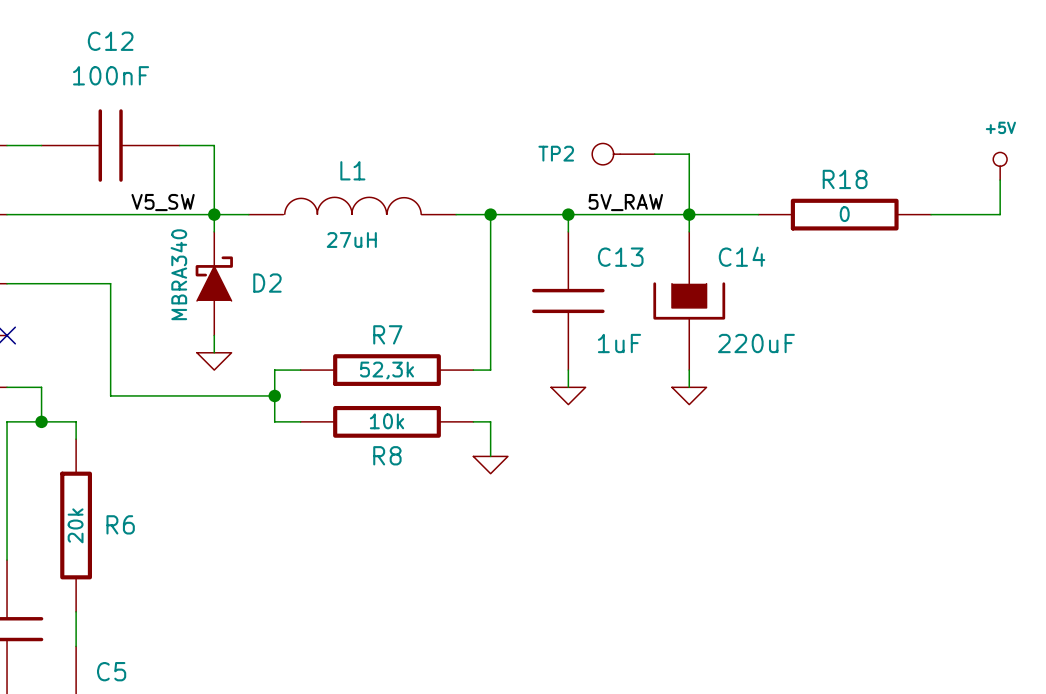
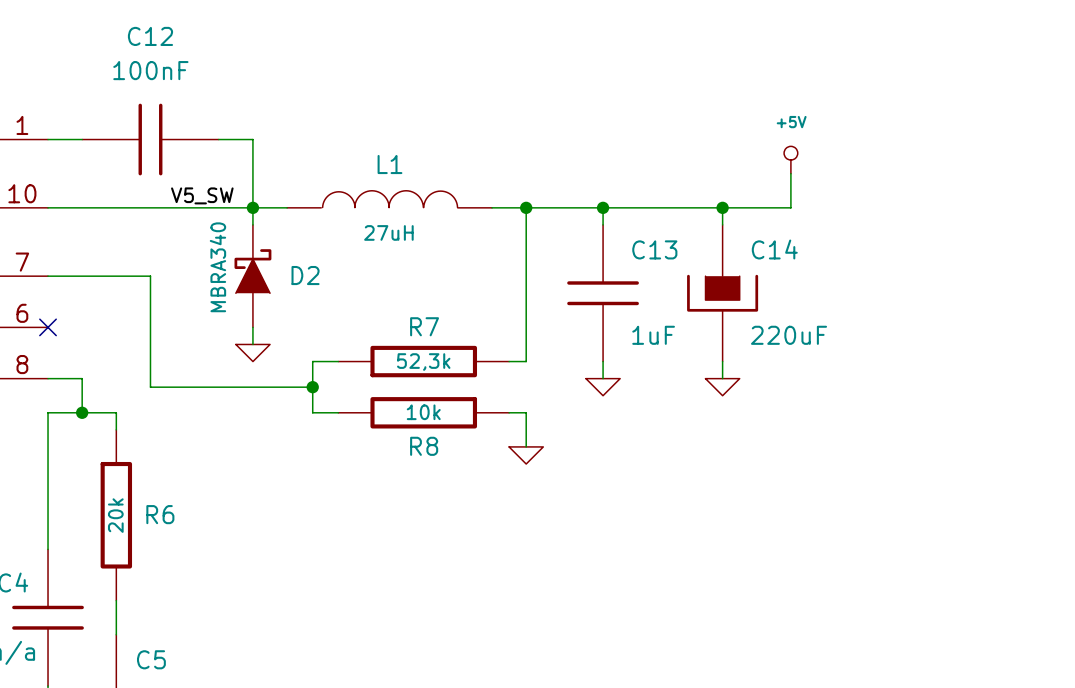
TP2: (623, 154) -> none
wire: (654, 154) (689, 154) (689, 214) -> none
power symbol position: +5V (1000, 166) -> +5V (790, 160)
wire: none -> (790, 173) (790, 207)
wire: (1000, 180) (1000, 214) (931, 214) -> none
label: 5V_RAW (625, 202) -> none
R18: 0 (844, 214) -> none

